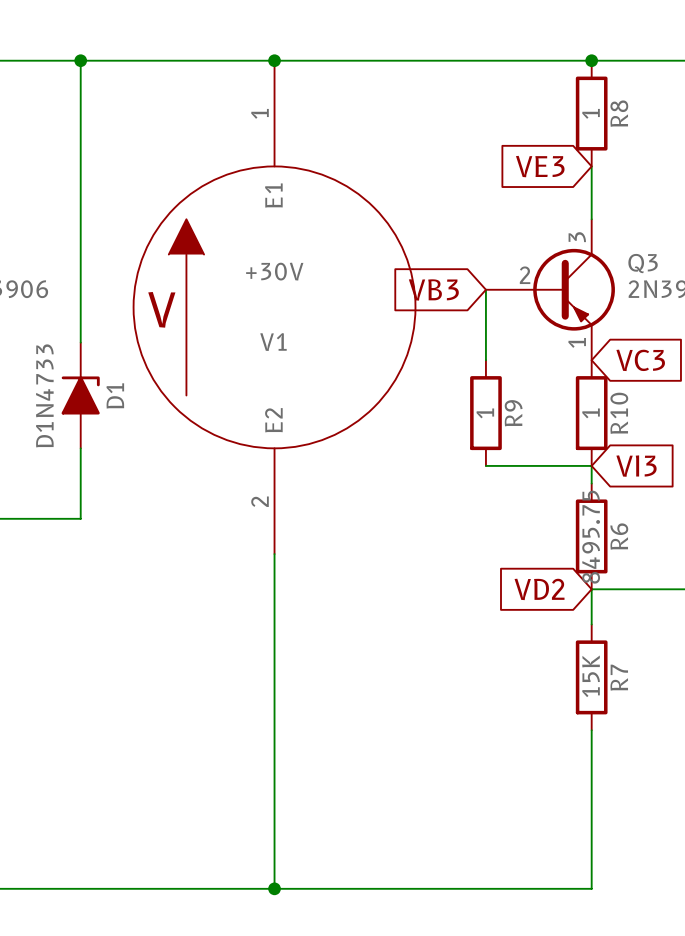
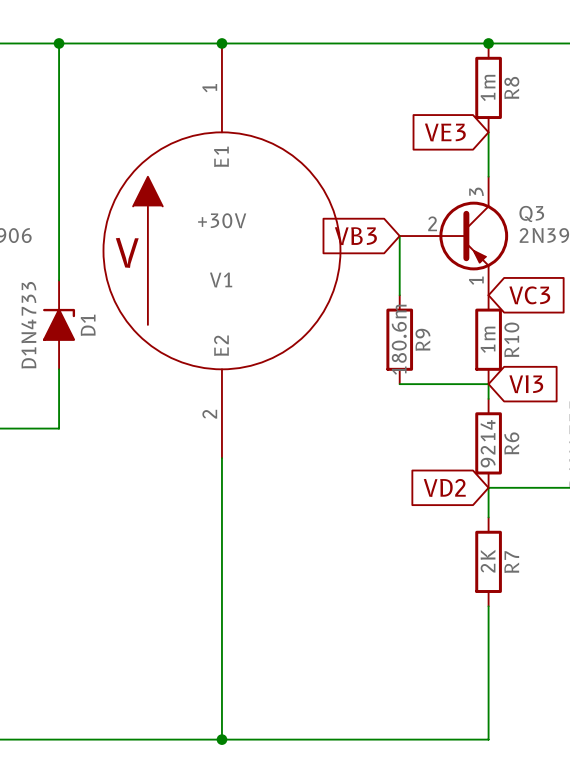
R8 value: 1 (591, 113) -> 1m (488, 87)
R9 value: 1 (485, 413) -> 180.6m (399, 339)
R10 value: 1 (591, 413) -> 1m (488, 339)
R6 value: 8495.75 (591, 537) -> 9214 (488, 443)
R7 value: 15K (591, 676) -> 2K (488, 561)

